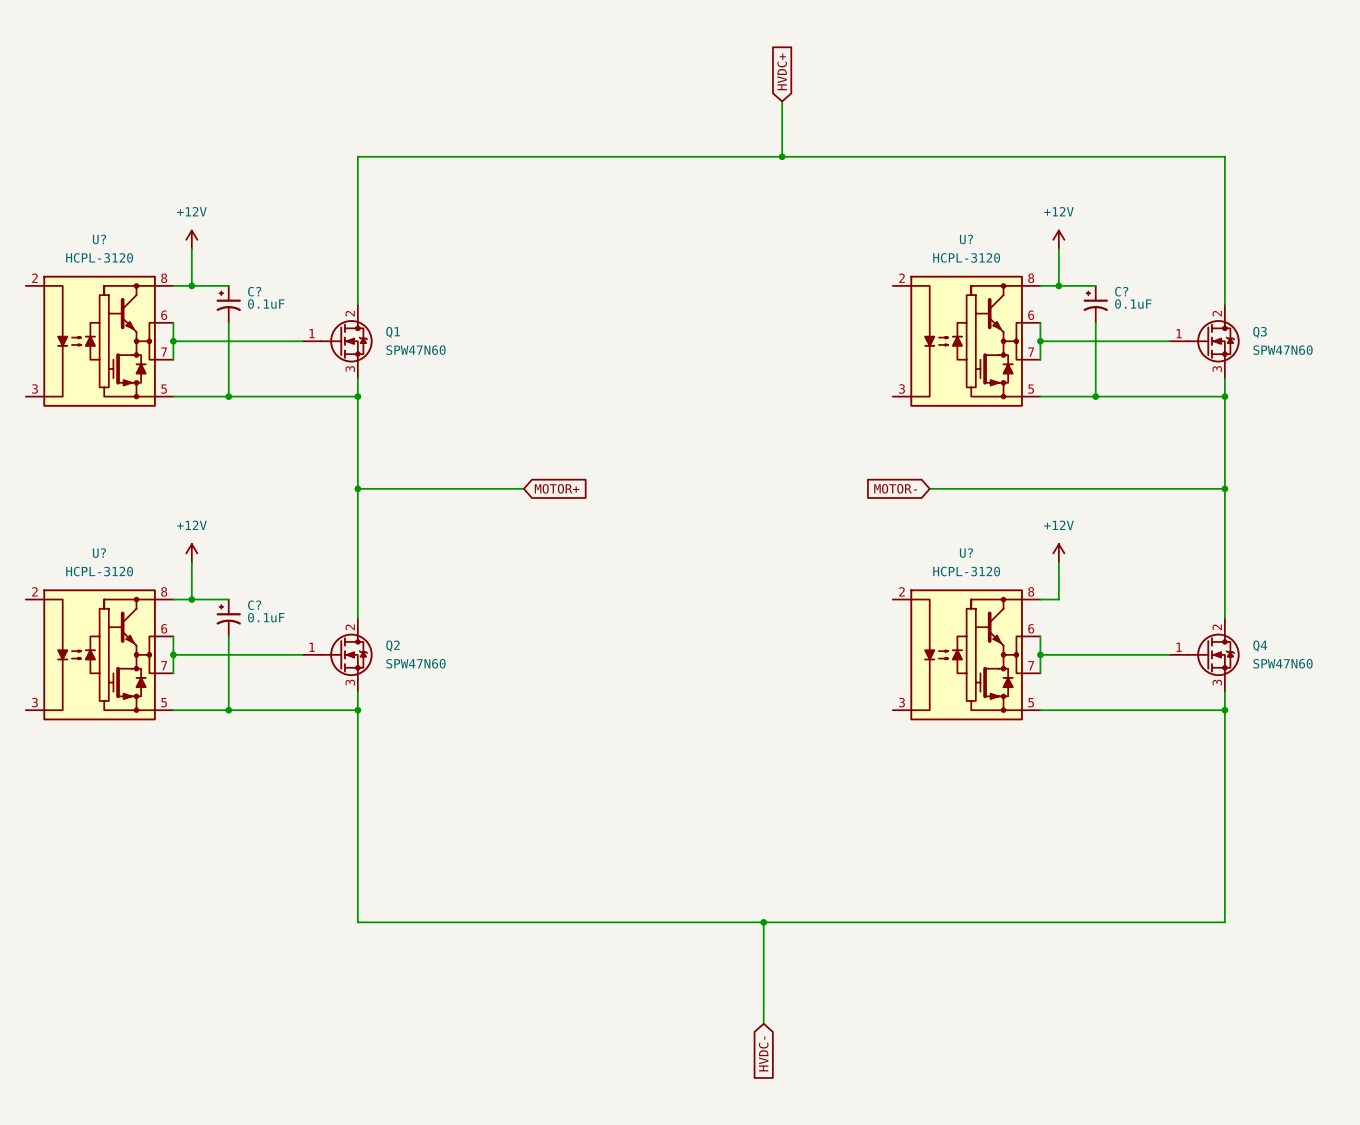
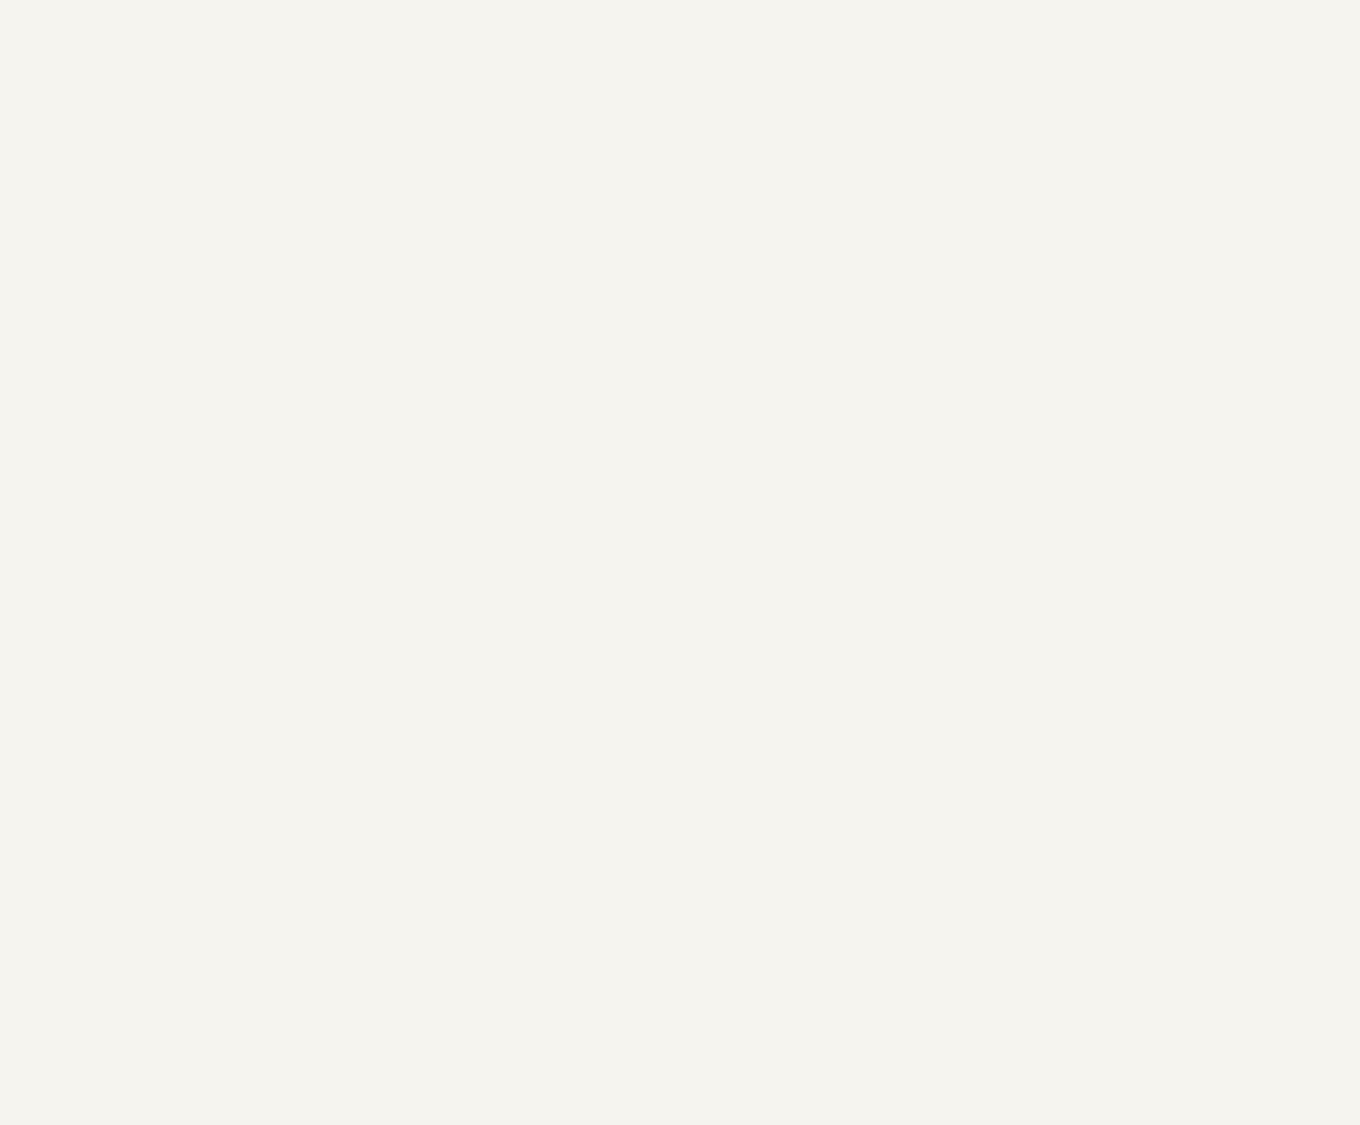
global label: HVDC+ (782, 71) -> none
wire: (782, 101) (782, 156) -> none
junction: (782, 156) -> none
power symbol: +12V (191, 239) -> none
power symbol: +12V (1058, 239) -> none
wire: (191, 249) (191, 285) -> none
wire: (1058, 249) (1058, 285) -> none
wire: (173, 285) (228, 285) -> none
junction: (191, 285) -> none
wire: (1040, 285) (1095, 285) -> none
junction: (1058, 285) -> none
C?: 0.1uF (228, 304) -> none
wire: (357, 304) (357, 156) (1224, 156) (1224, 304) -> none
C?: 0.1uF (1095, 304) -> none
wire: (173, 322) (173, 359) -> none
wire: (228, 322) (228, 396) -> none
wire: (1040, 322) (1040, 359) -> none
wire: (1095, 322) (1095, 396) -> none
U?: HCPL-3120 (99, 341) -> none
wire: (173, 341) (302, 341) -> none
junction: (173, 341) -> none
Q1: SPW47N60 (337, 341) -> none
U?: HCPL-3120 (966, 341) -> none
wire: (1040, 341) (1169, 341) -> none
junction: (1040, 341) -> none
Q3: SPW47N60 (1204, 341) -> none
wire: (357, 378) (357, 617) -> none
wire: (1224, 378) (1224, 617) -> none
wire: (173, 396) (357, 396) -> none
junction: (228, 396) -> none
junction: (357, 396) -> none
wire: (1040, 396) (1224, 396) -> none
junction: (1095, 396) -> none
junction: (1224, 396) -> none
wire: (357, 488) (523, 488) -> none
junction: (357, 488) -> none
global label: MOTOR+ (557, 488) -> none
global label: MOTOR- (895, 488) -> none
wire: (929, 488) (1224, 488) -> none
junction: (1224, 488) -> none
power symbol: +12V (191, 553) -> none
power symbol: +12V (1058, 553) -> none
wire: (191, 562) (191, 599) -> none
wire: (1058, 562) (1058, 599) (1040, 599) -> none
wire: (173, 599) (228, 599) -> none
junction: (191, 599) -> none
C?: 0.1uF (228, 617) -> none
wire: (173, 636) (173, 673) -> none
wire: (228, 636) (228, 710) -> none
wire: (1040, 636) (1040, 673) -> none
U?: HCPL-3120 (99, 654) -> none
wire: (173, 654) (302, 654) -> none
junction: (173, 654) -> none
Q2: SPW47N60 (337, 654) -> none
U?: HCPL-3120 (966, 654) -> none
wire: (1040, 654) (1169, 654) -> none
junction: (1040, 654) -> none
Q4: SPW47N60 (1204, 654) -> none
wire: (357, 691) (357, 922) (1224, 922) (1224, 691) -> none
wire: (173, 710) (357, 710) -> none
junction: (228, 710) -> none
junction: (357, 710) -> none
wire: (1040, 710) (1224, 710) -> none
junction: (1224, 710) -> none
wire: (763, 922) (763, 1023) -> none
junction: (763, 922) -> none
global label: HVDC- (763, 1053) -> none

